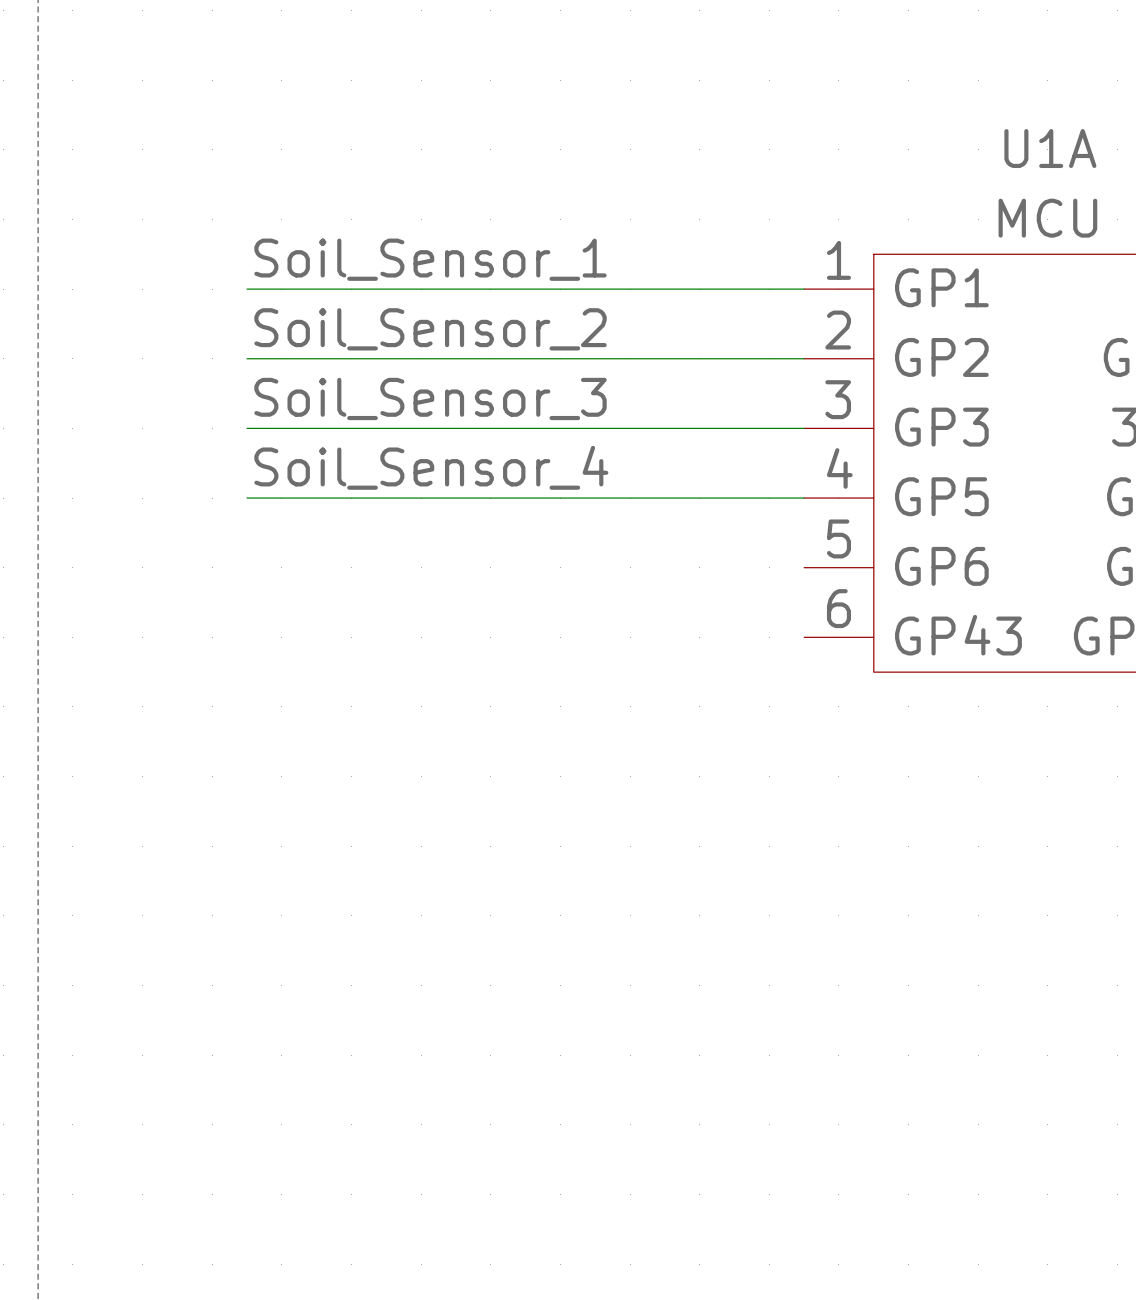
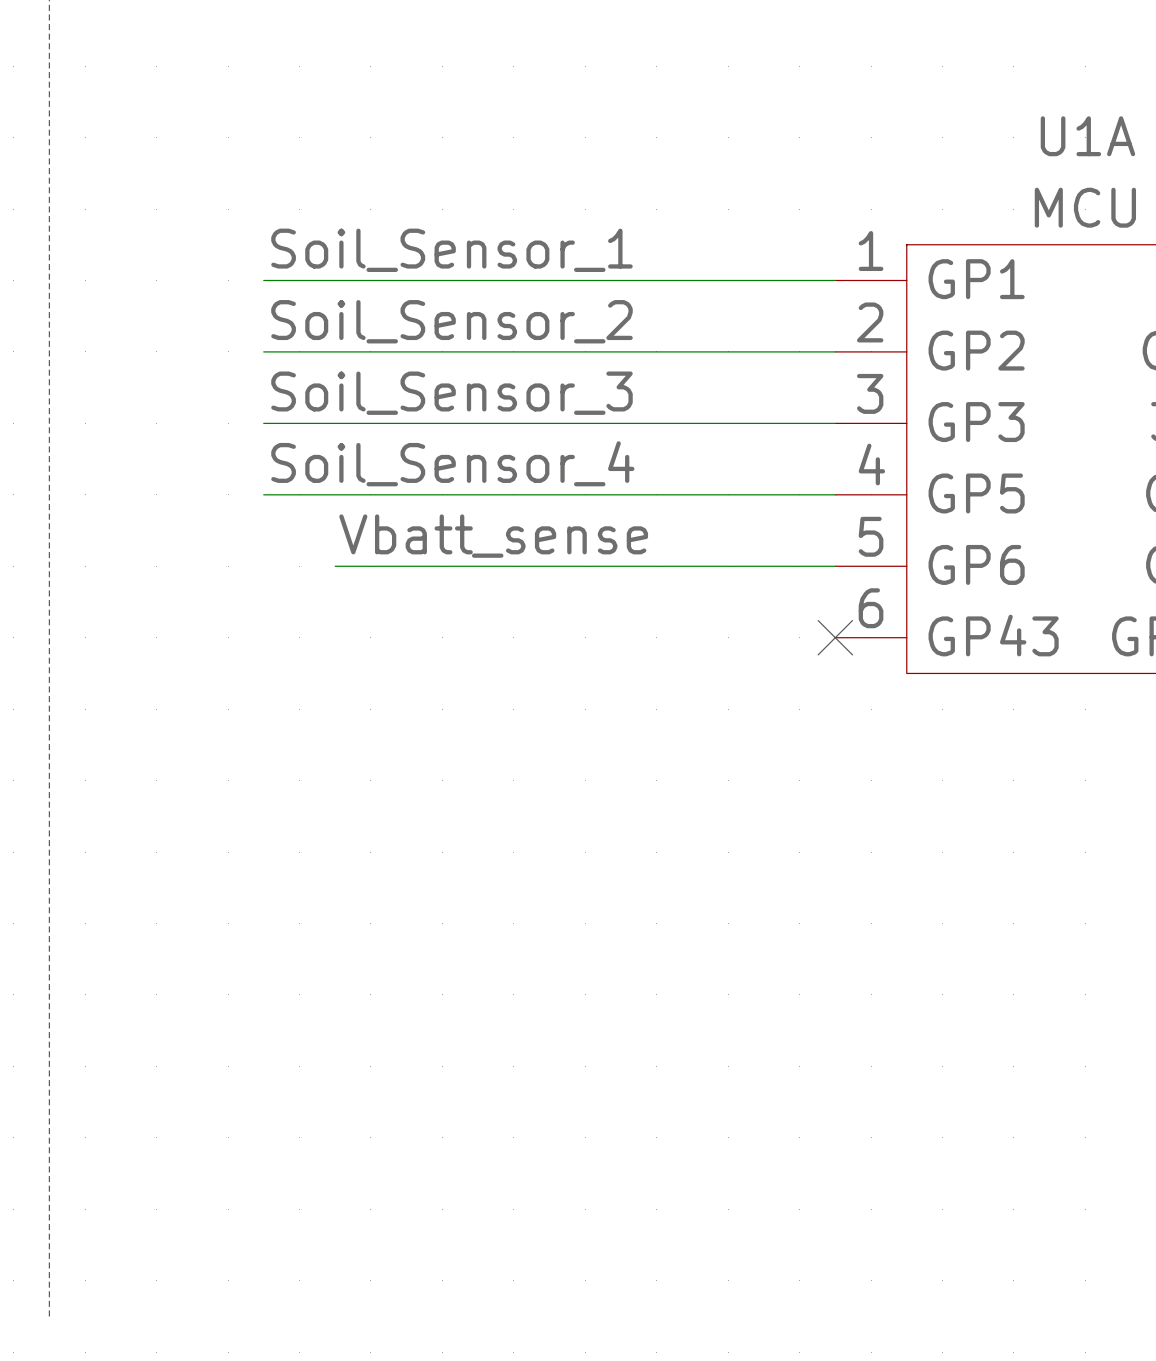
label: none -> Vbatt_sense (493, 536)
wire: none -> (335, 566) (835, 566)
no-connect mark: none -> (835, 637)

